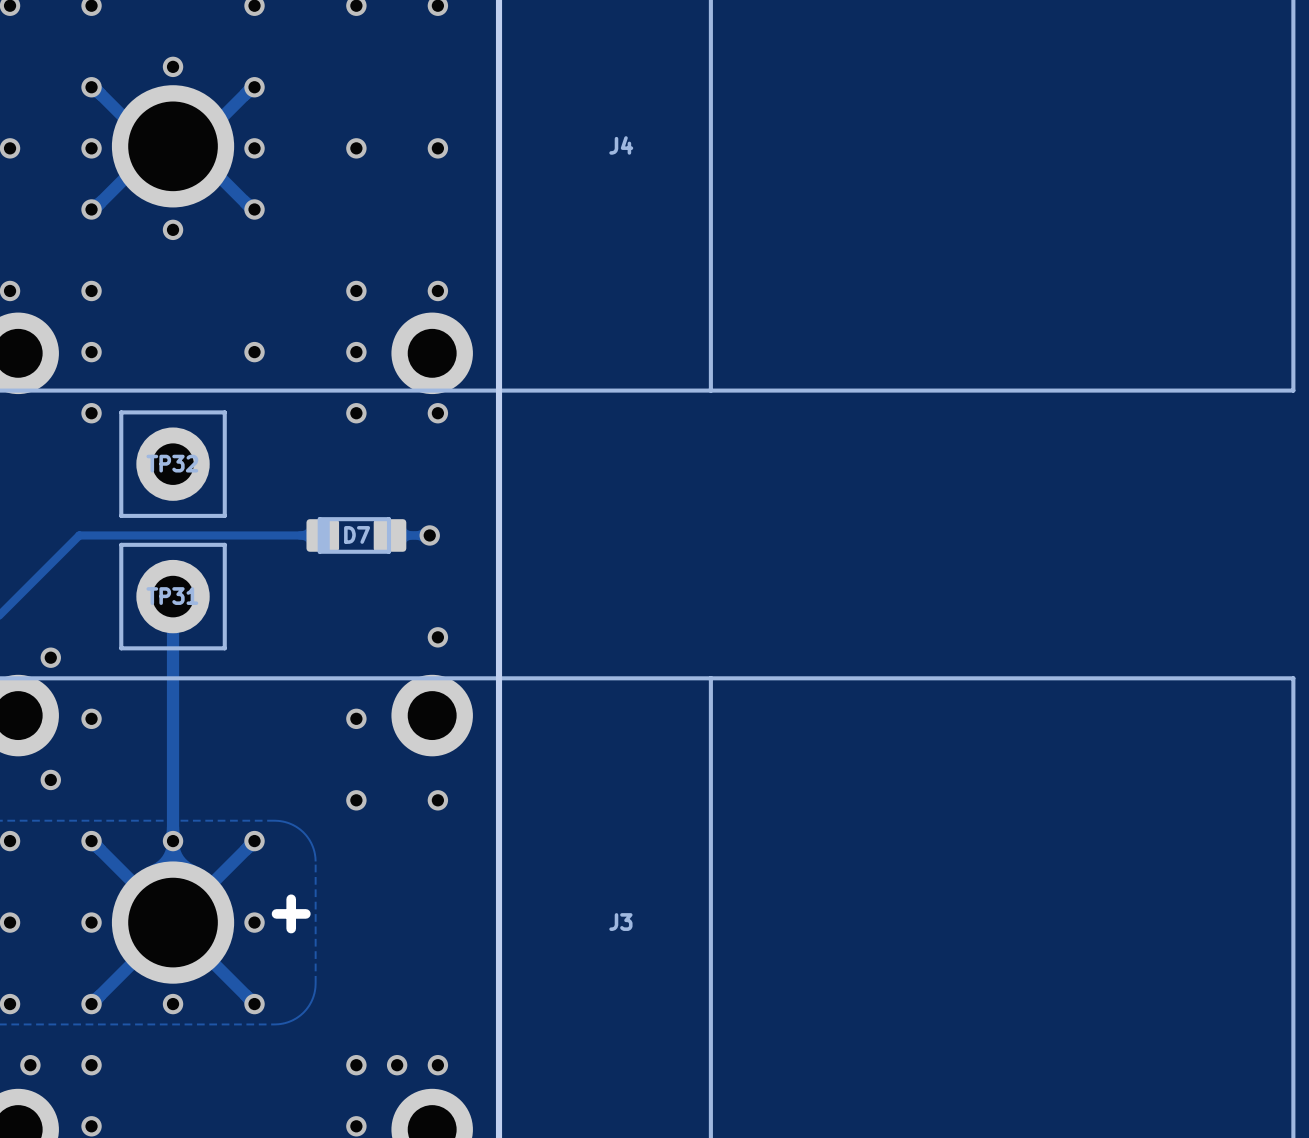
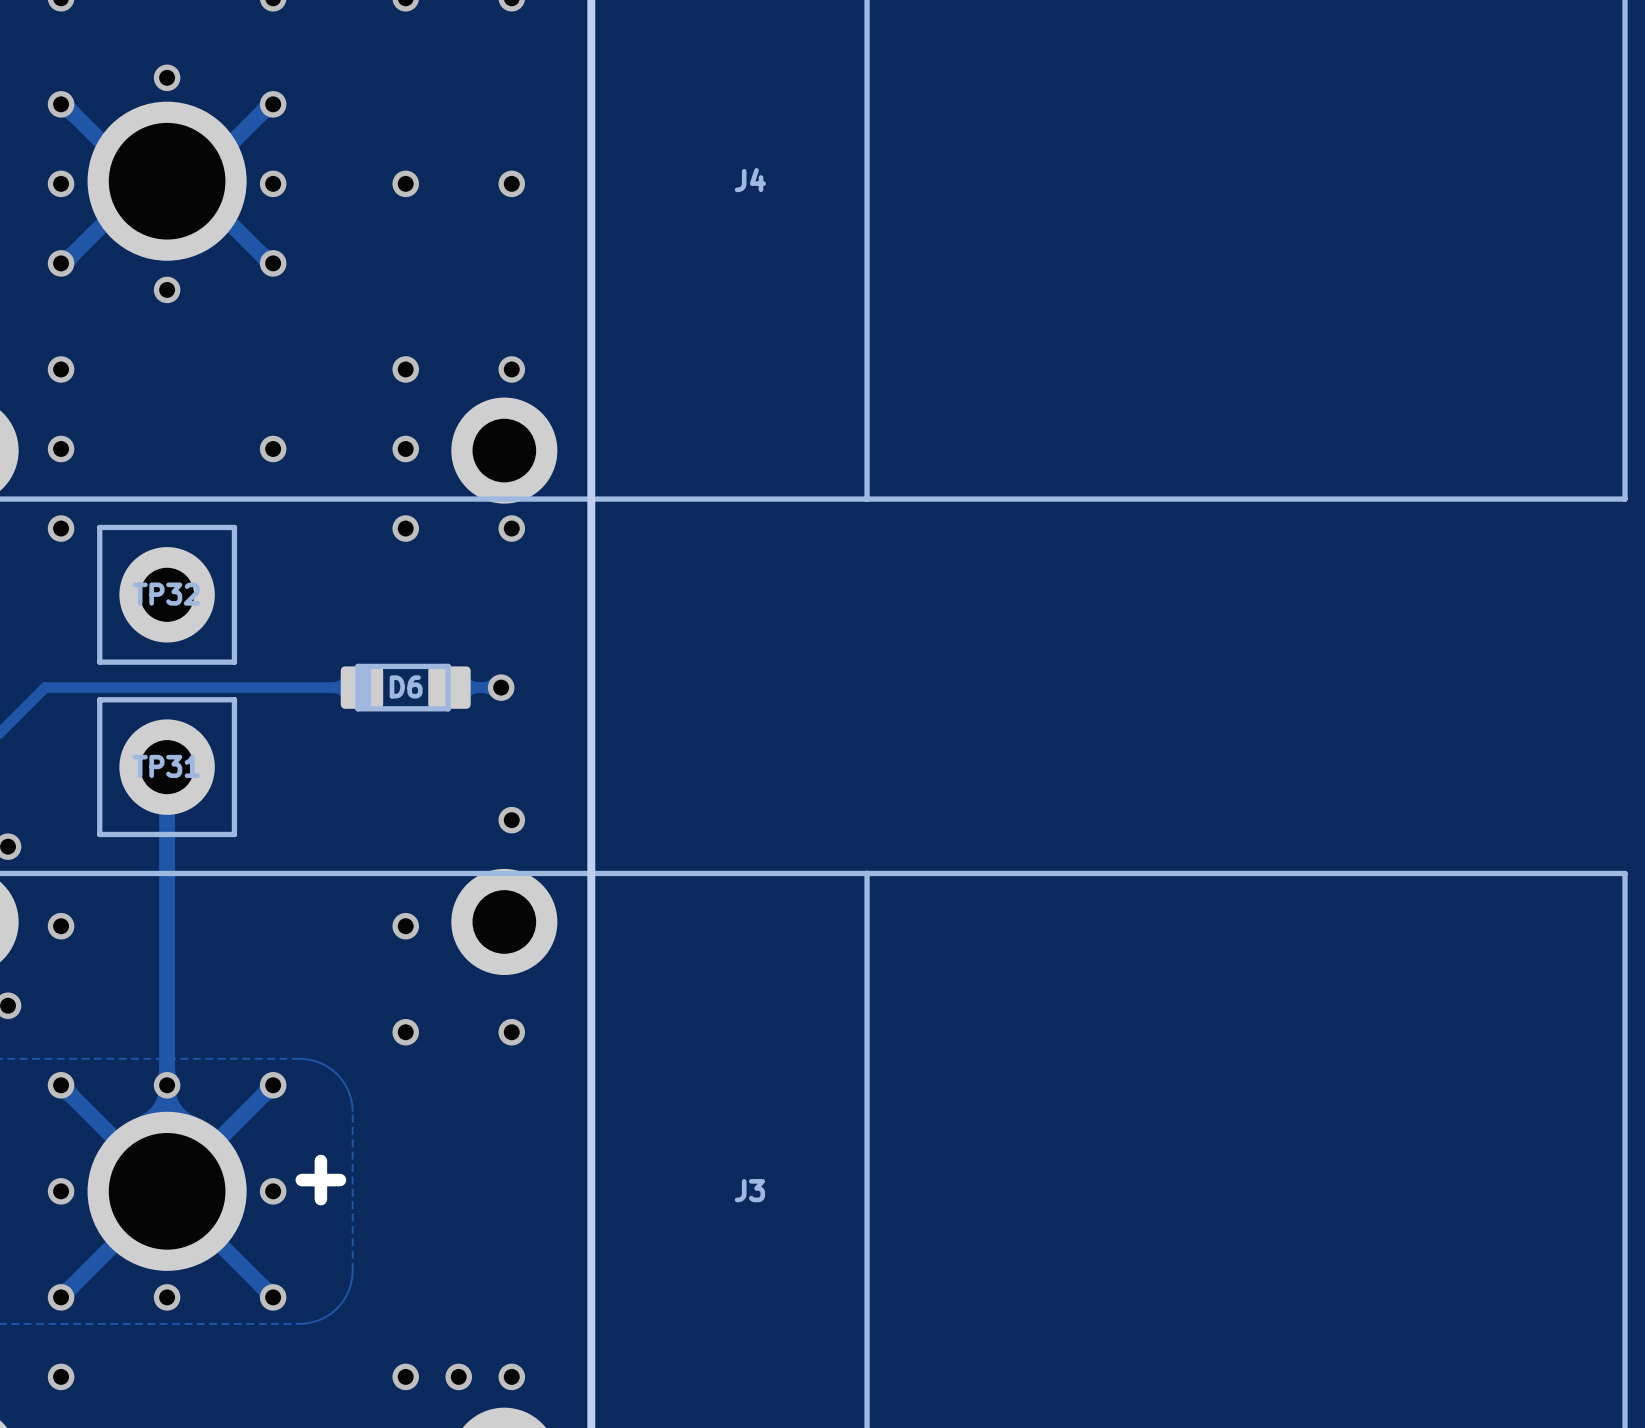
D7 name: D7 (357, 534) -> D6 (406, 686)

